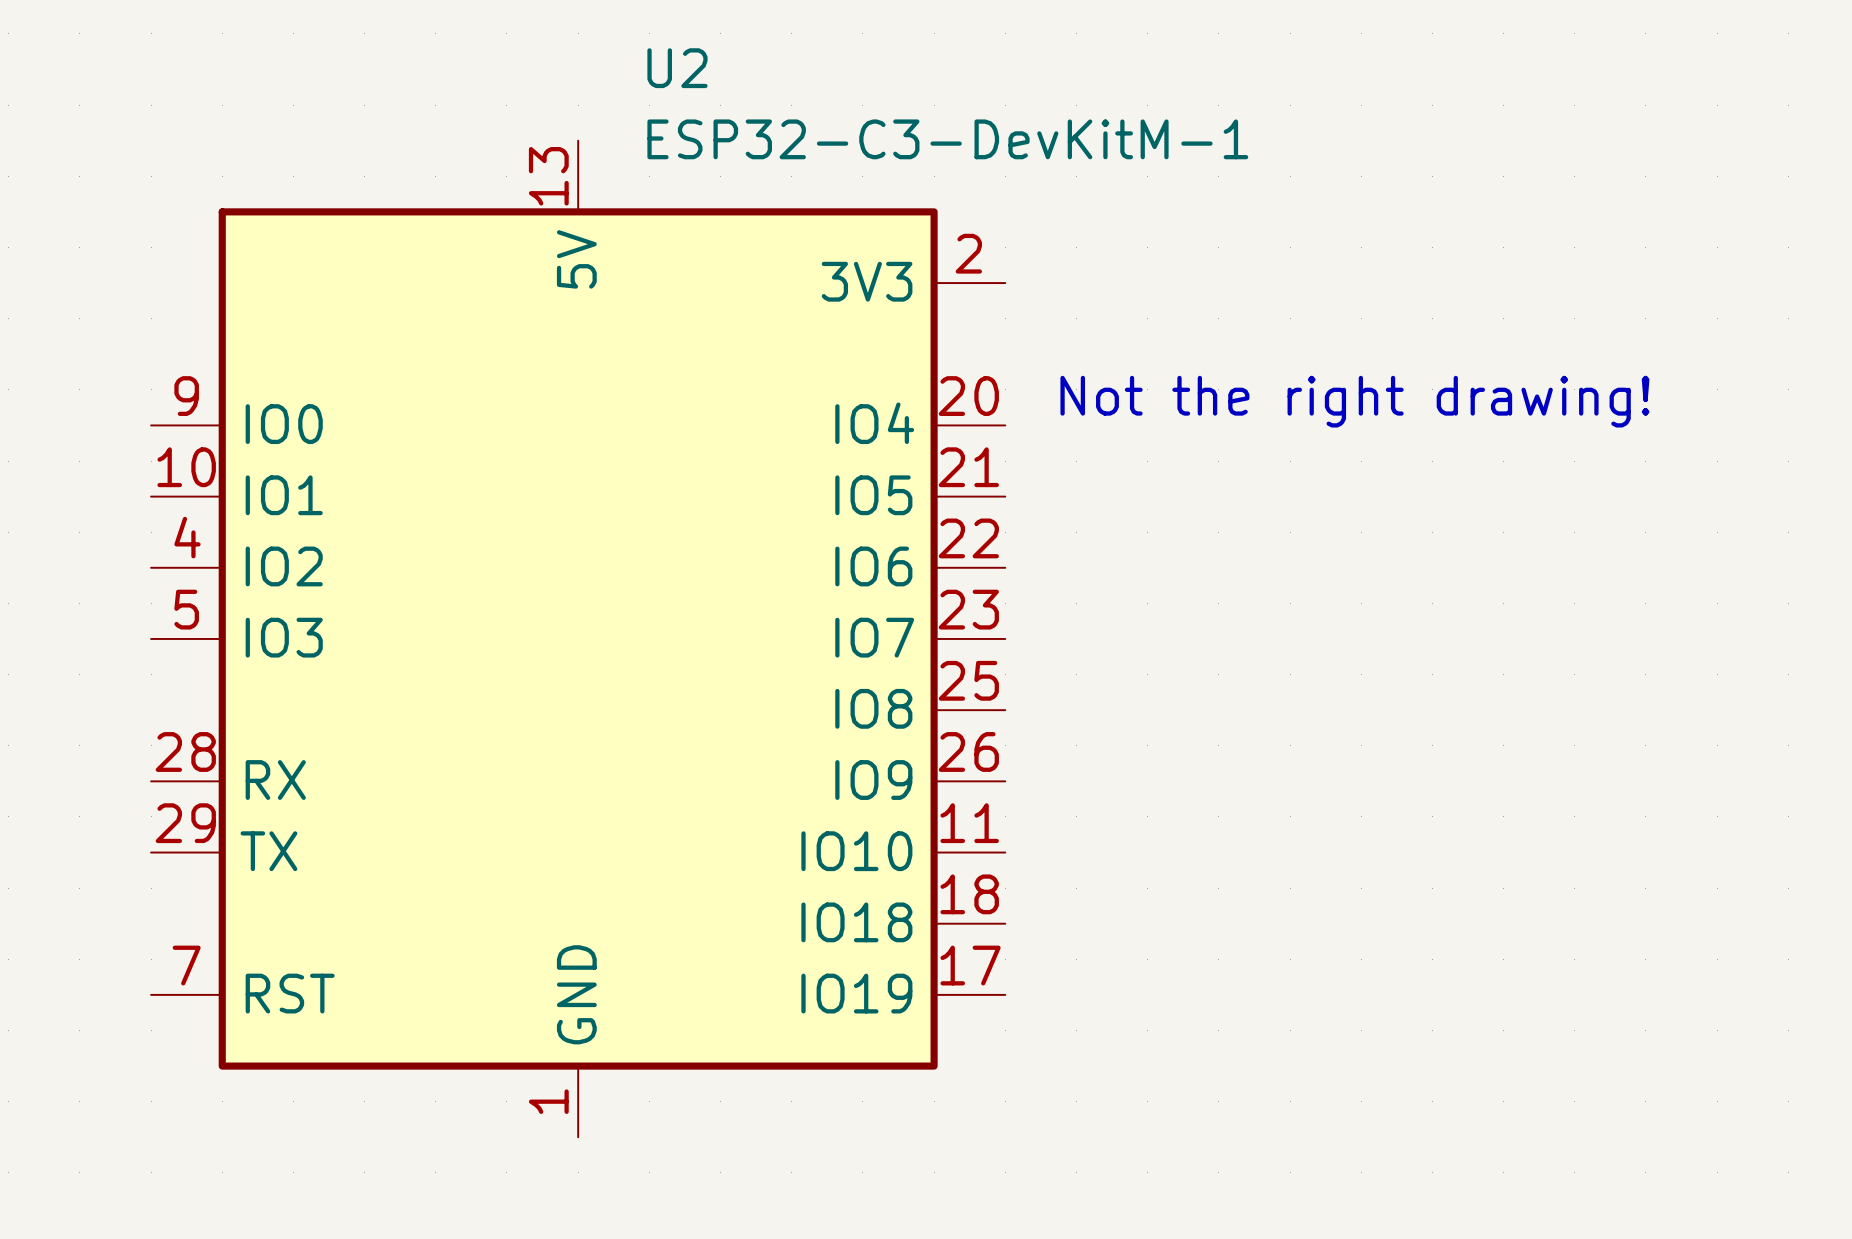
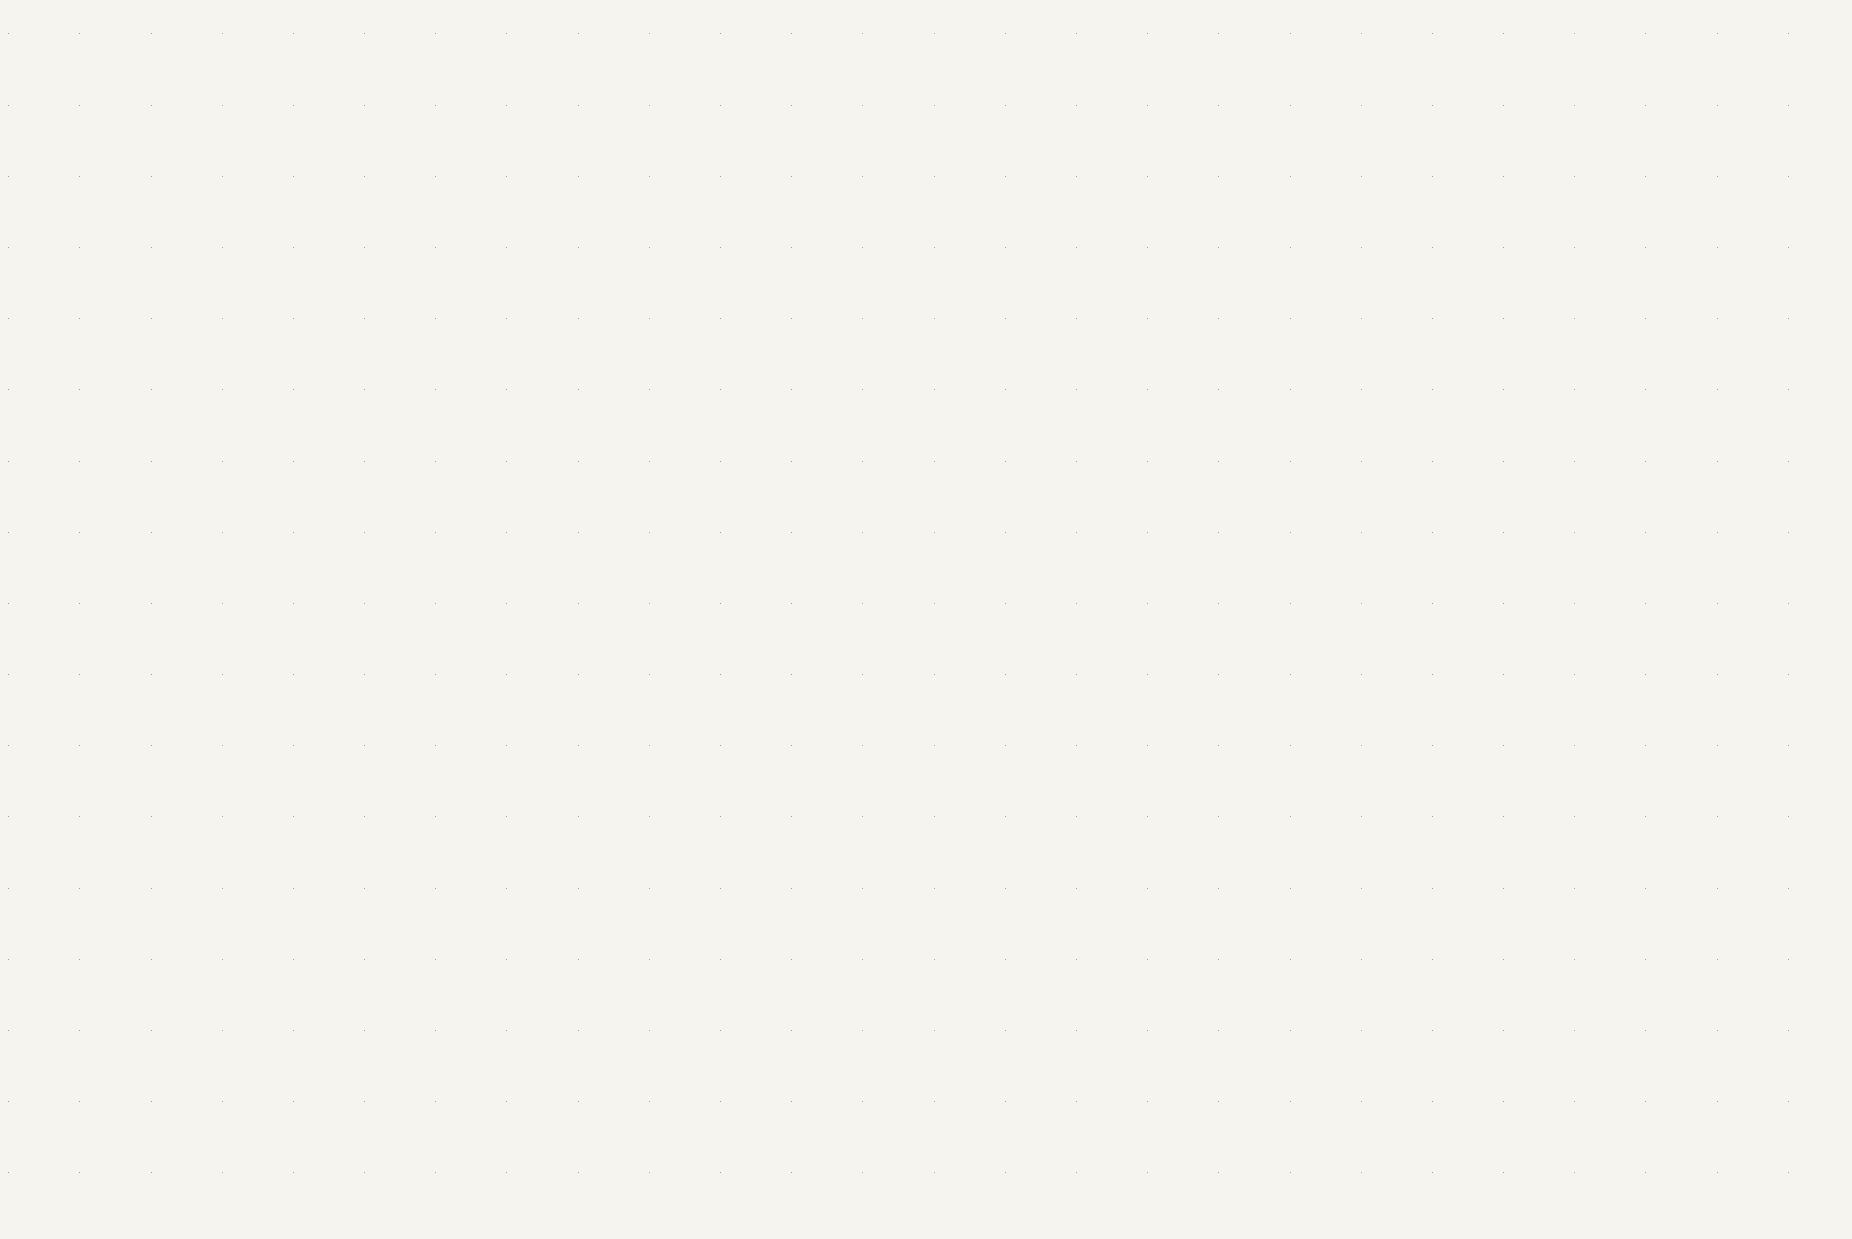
text: Not the right drawing! (1354, 401) -> none
U2: ESP32-C3-DevKitM-1 (578, 638) -> none

